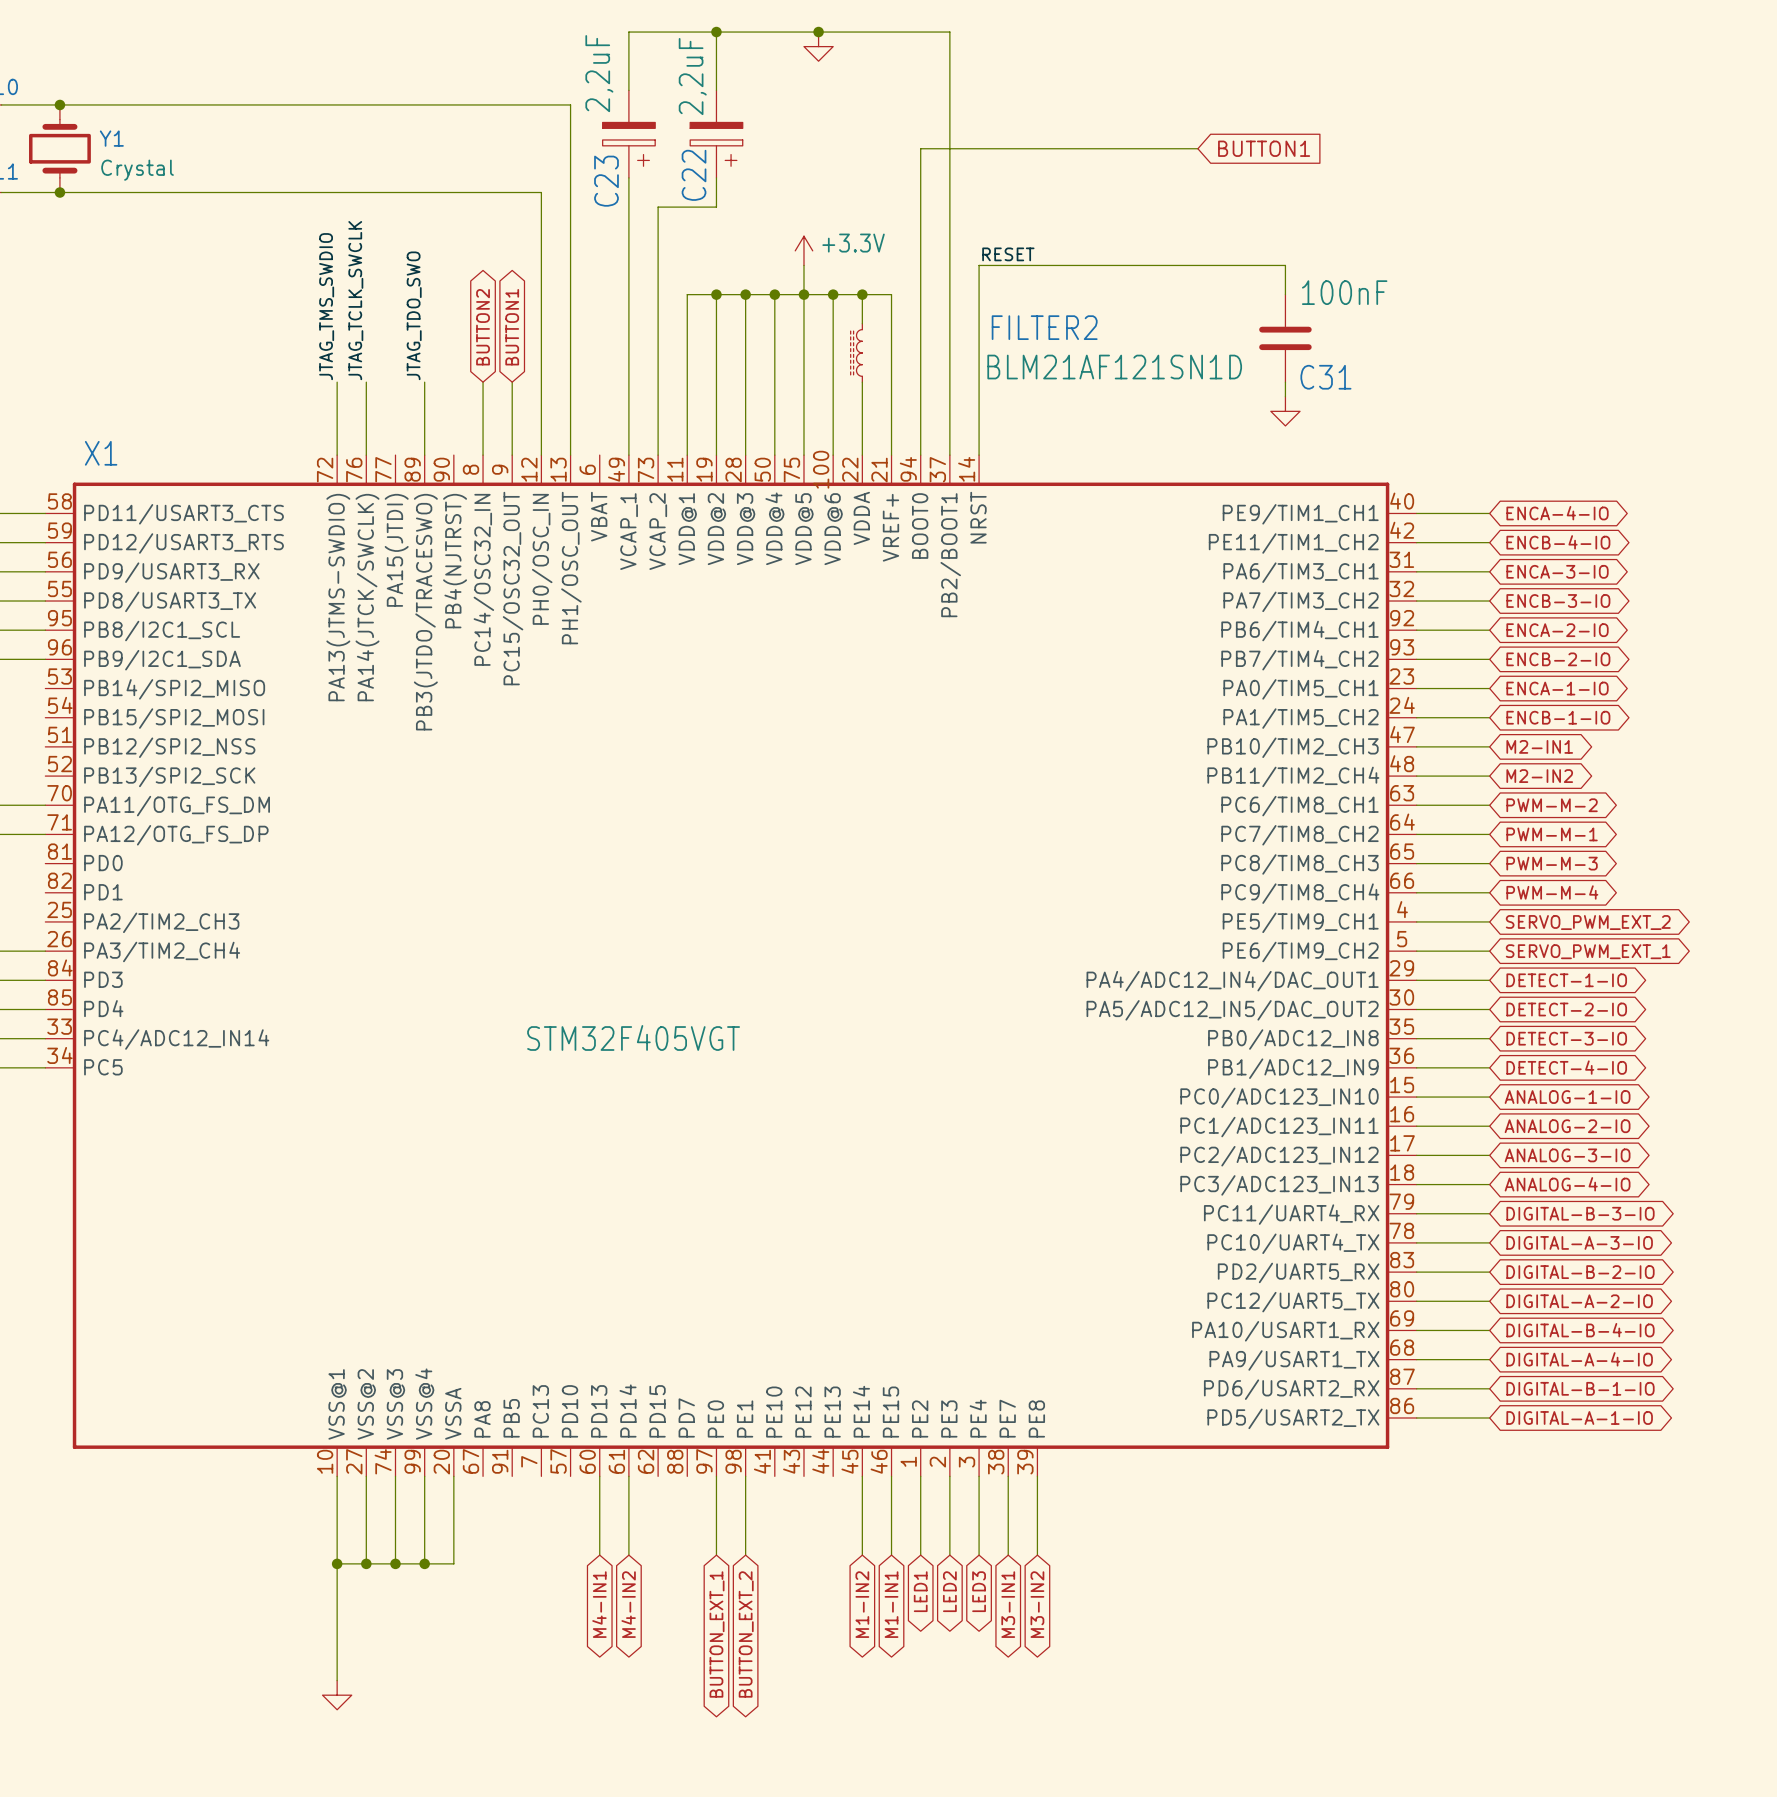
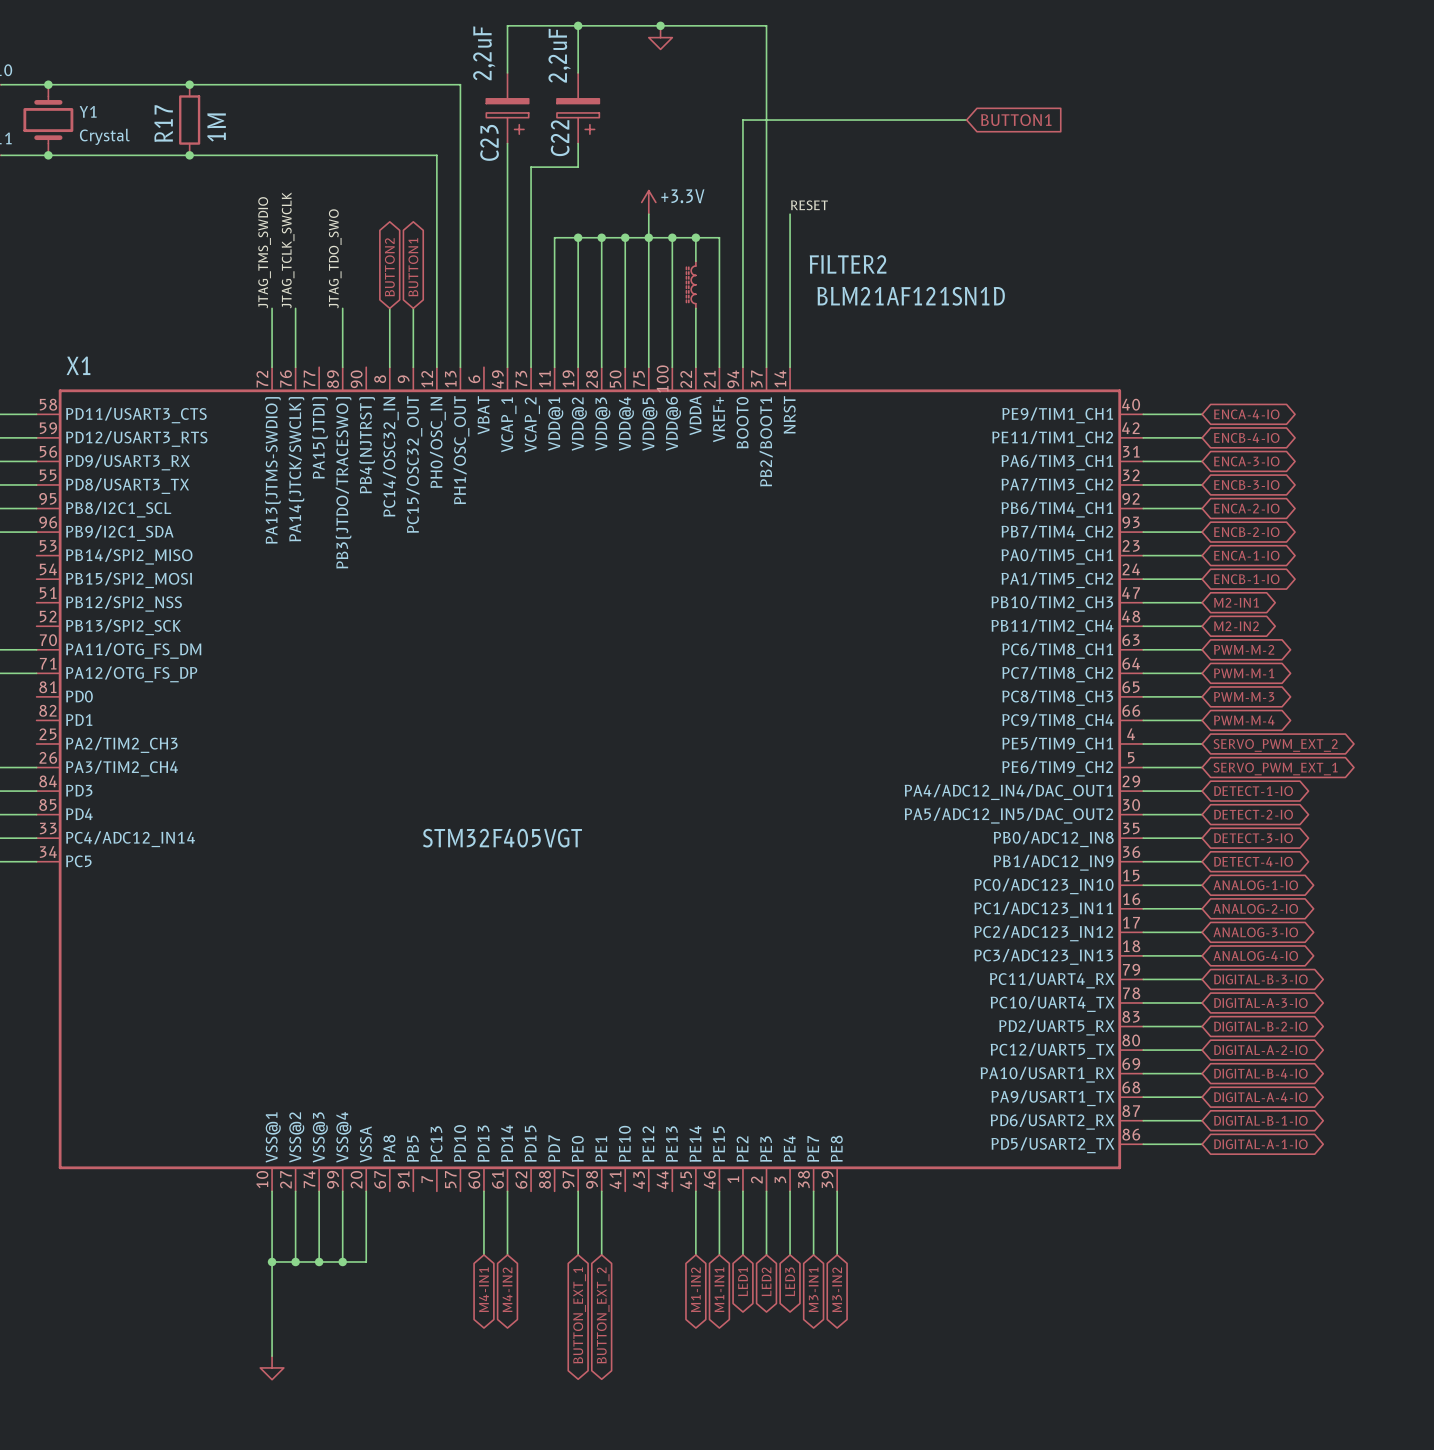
junction: none -> (189, 84)
R17: none -> 1M (189, 120)
junction: none -> (189, 155)
wire: (979, 265) (1285, 265) (1285, 294) -> none
C31: 100nF (1285, 338) -> none
wire: (1285, 382) (1285, 396) -> none
power symbol: (1285, 411) -> none

